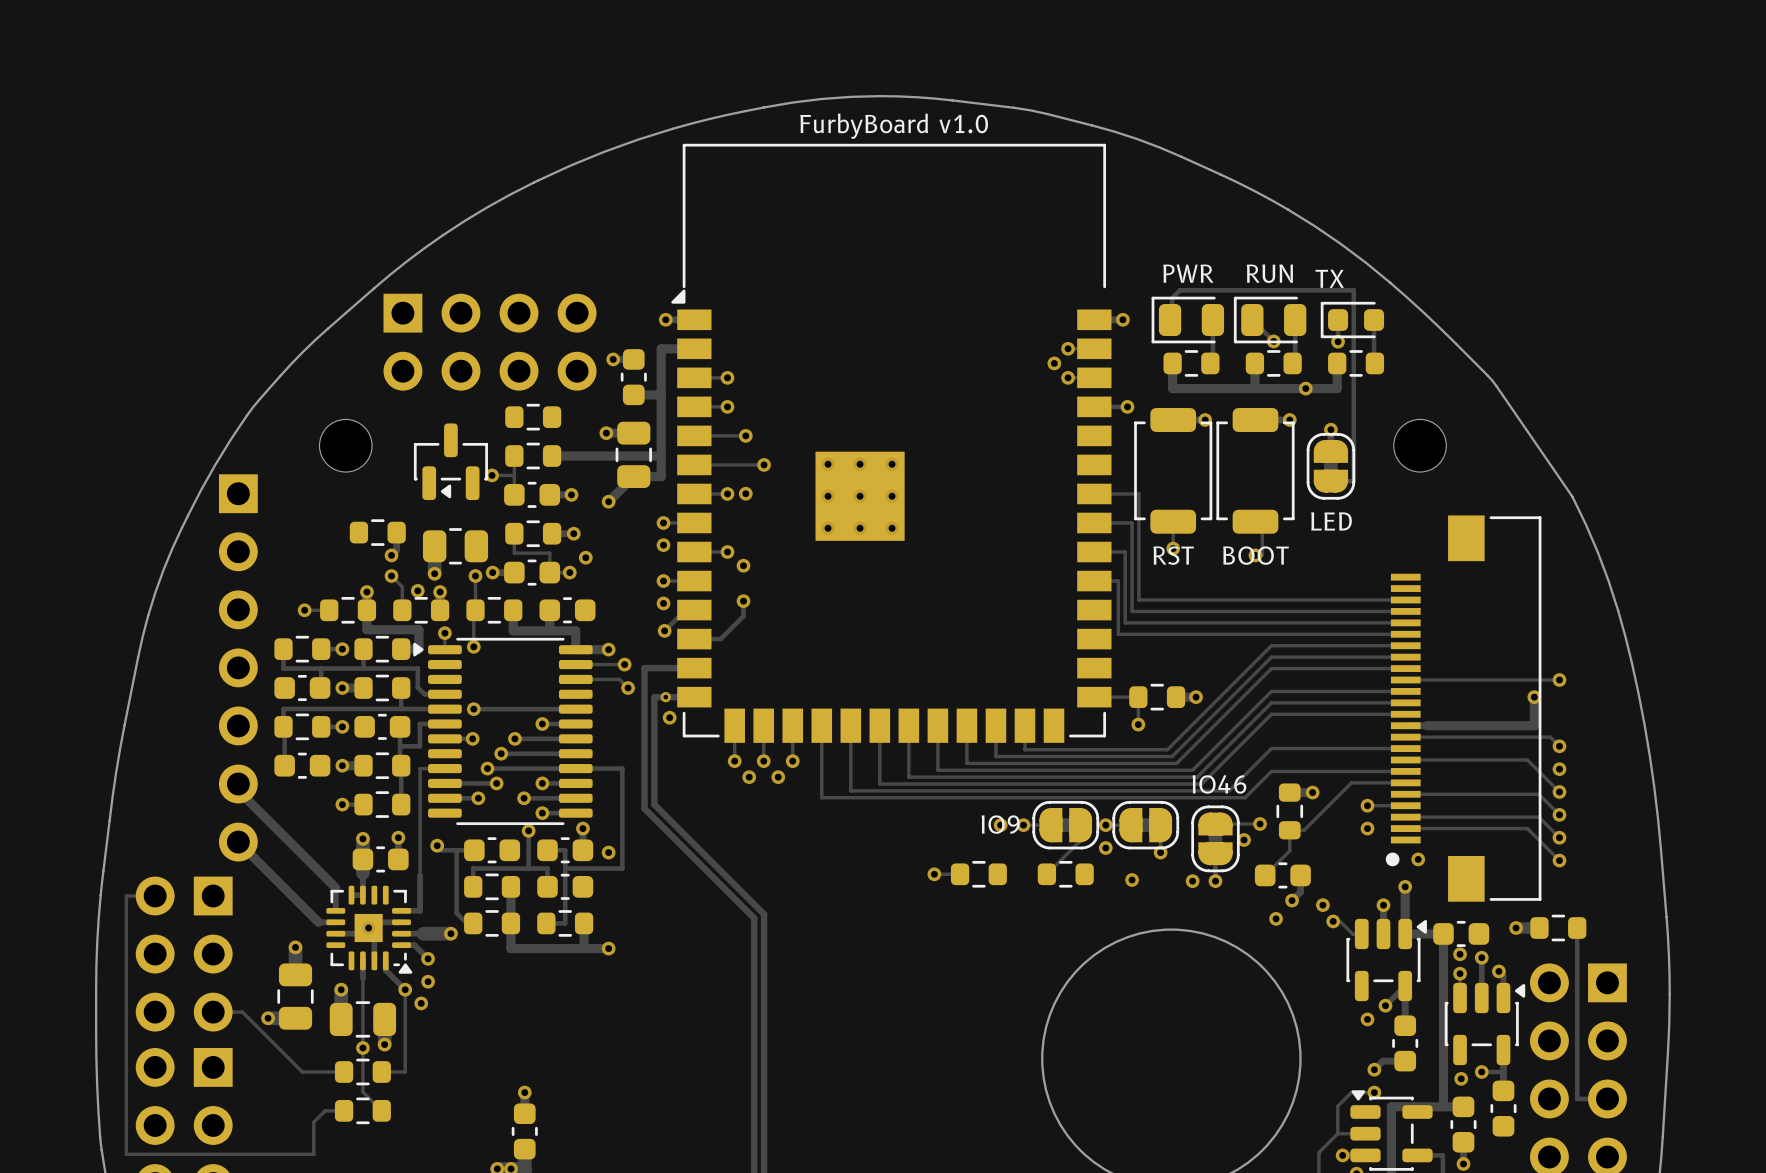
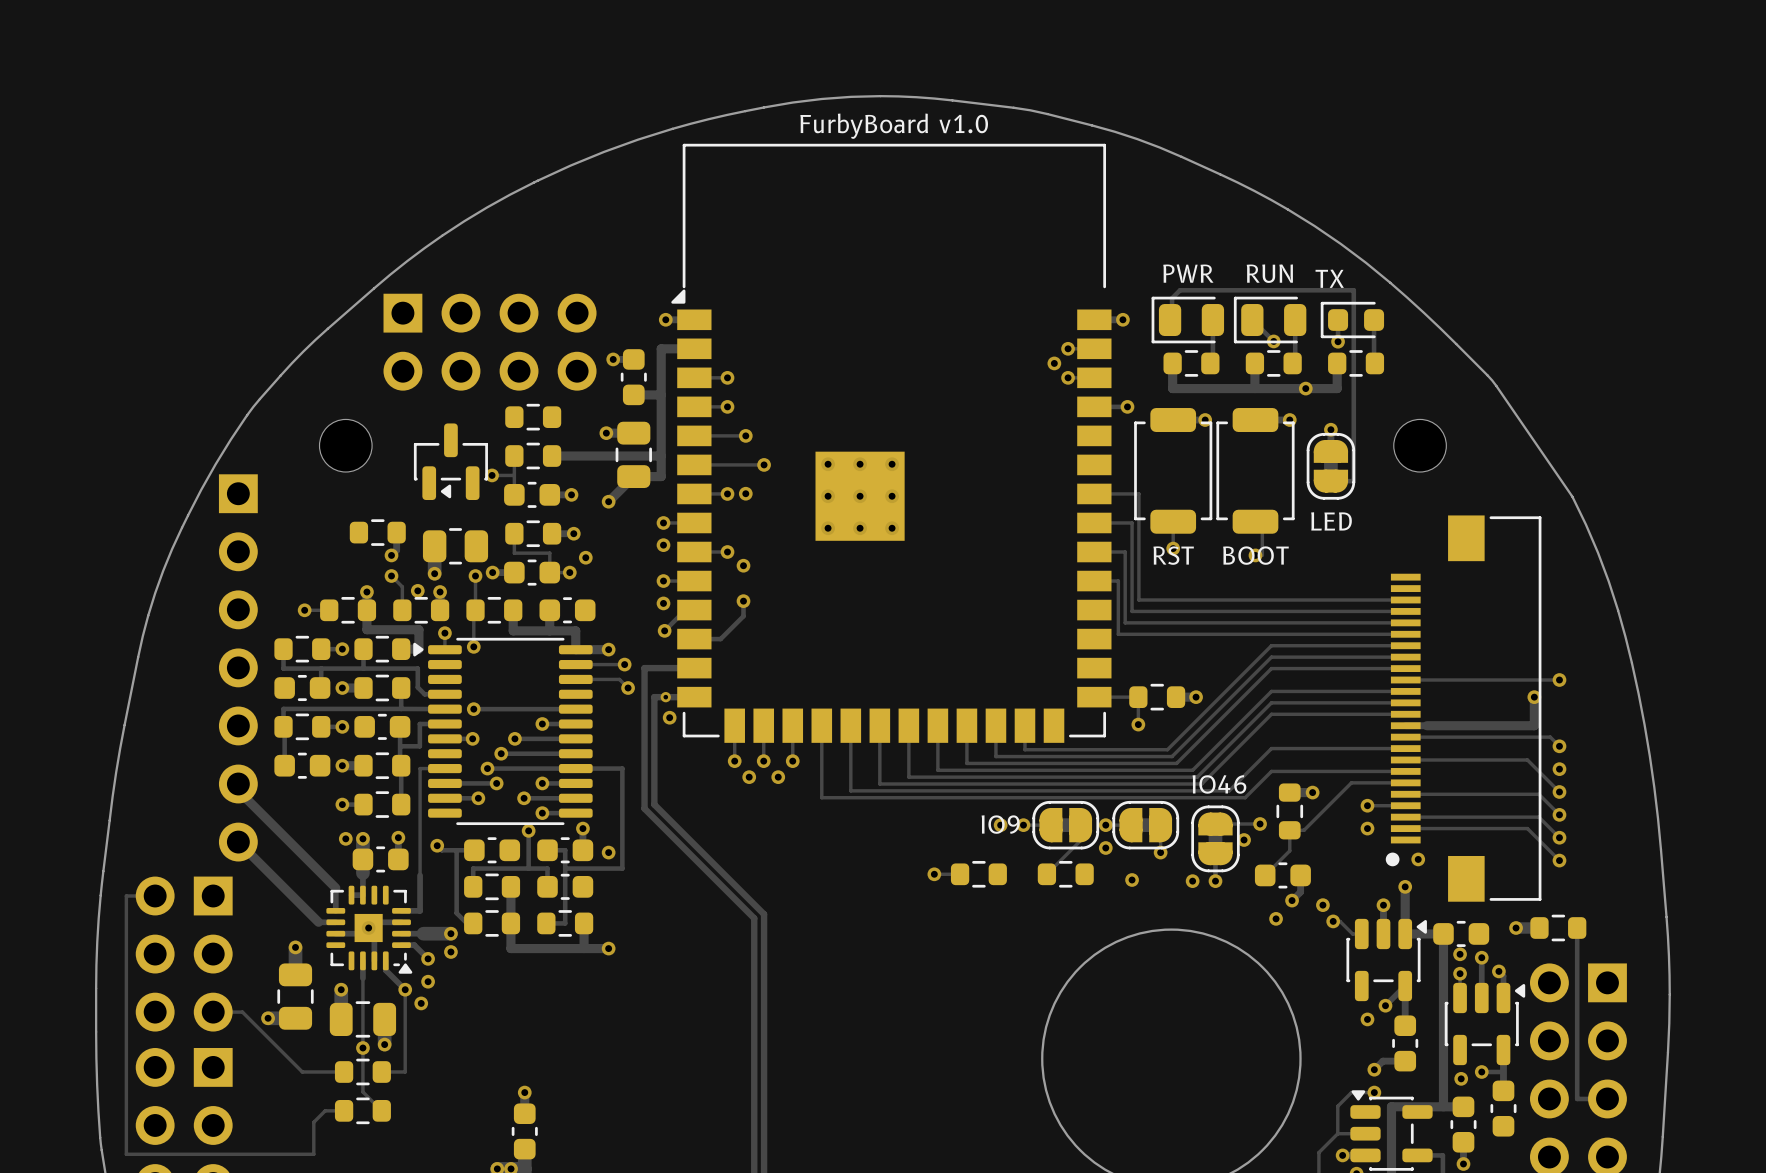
via: none -> (345, 838)
via: none -> (450, 952)

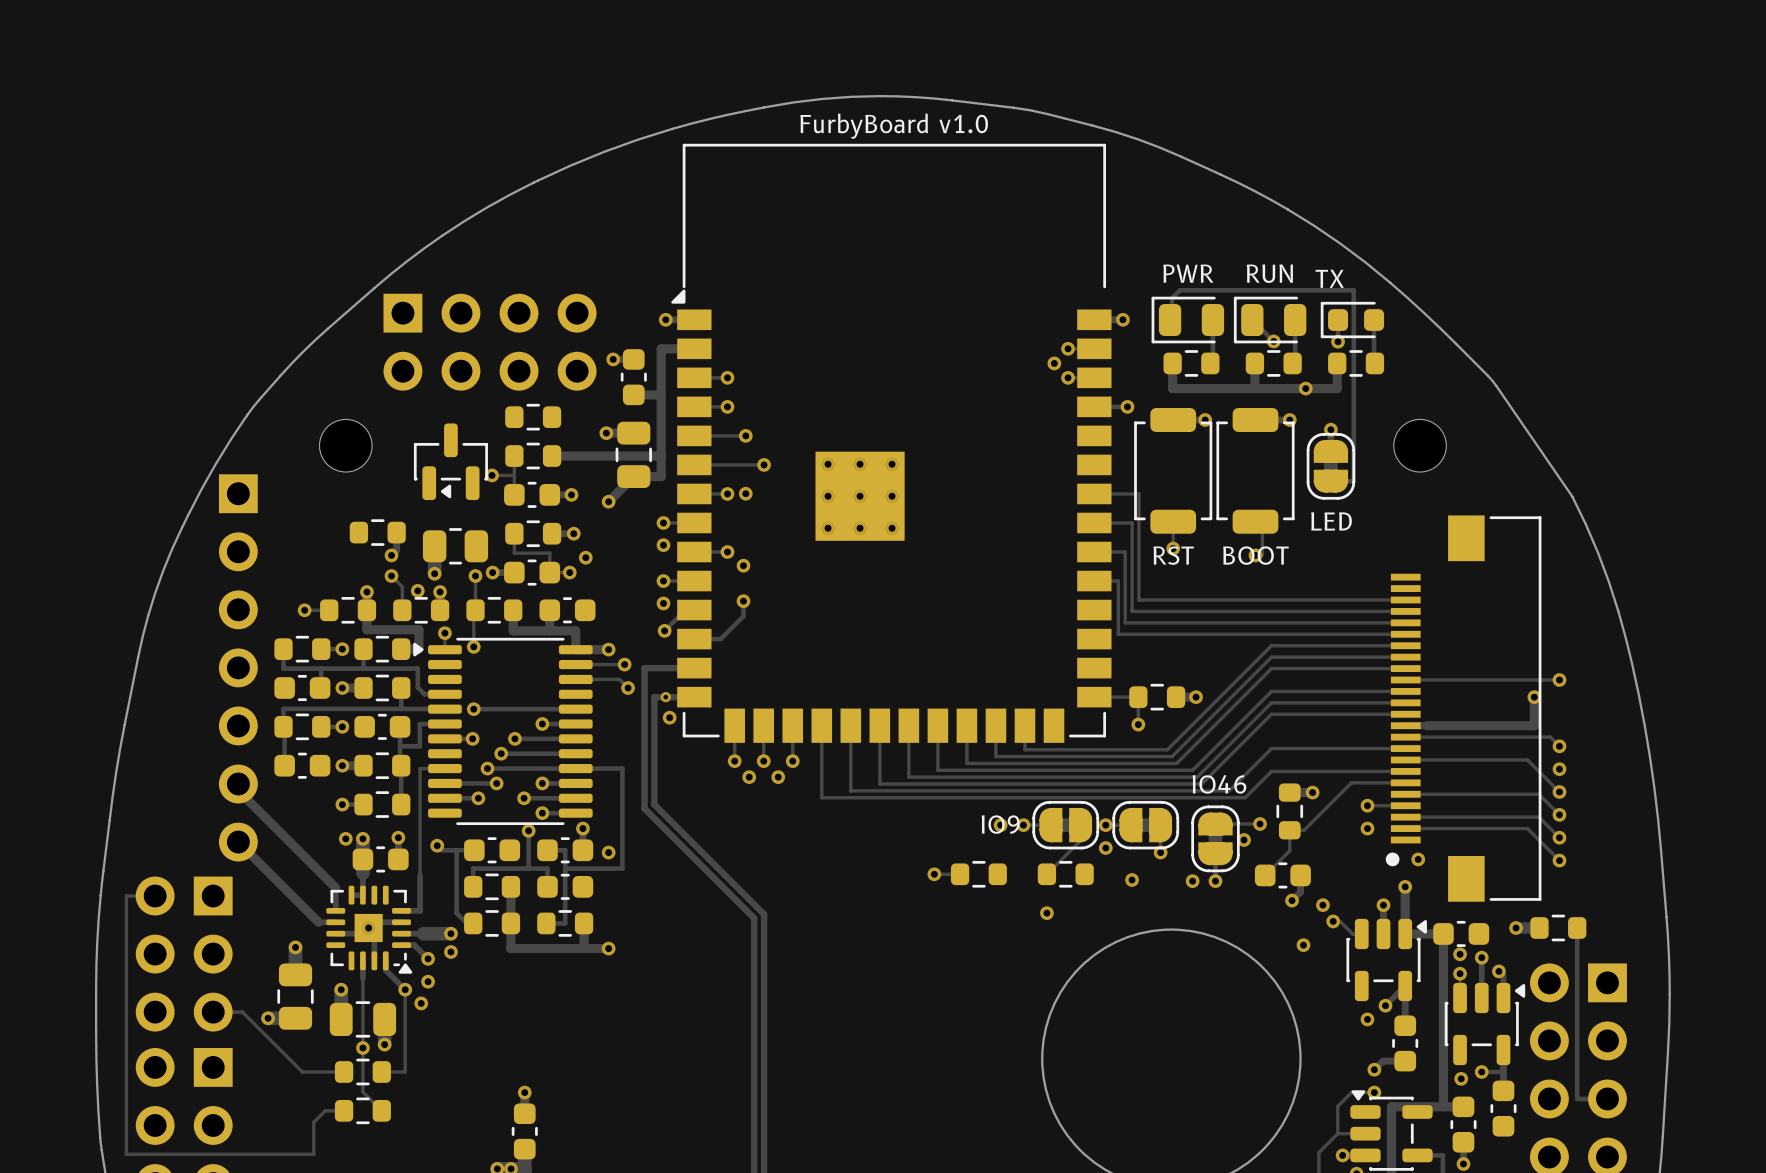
via: none -> (1046, 913)
via position: (1276, 918) -> (1303, 945)

